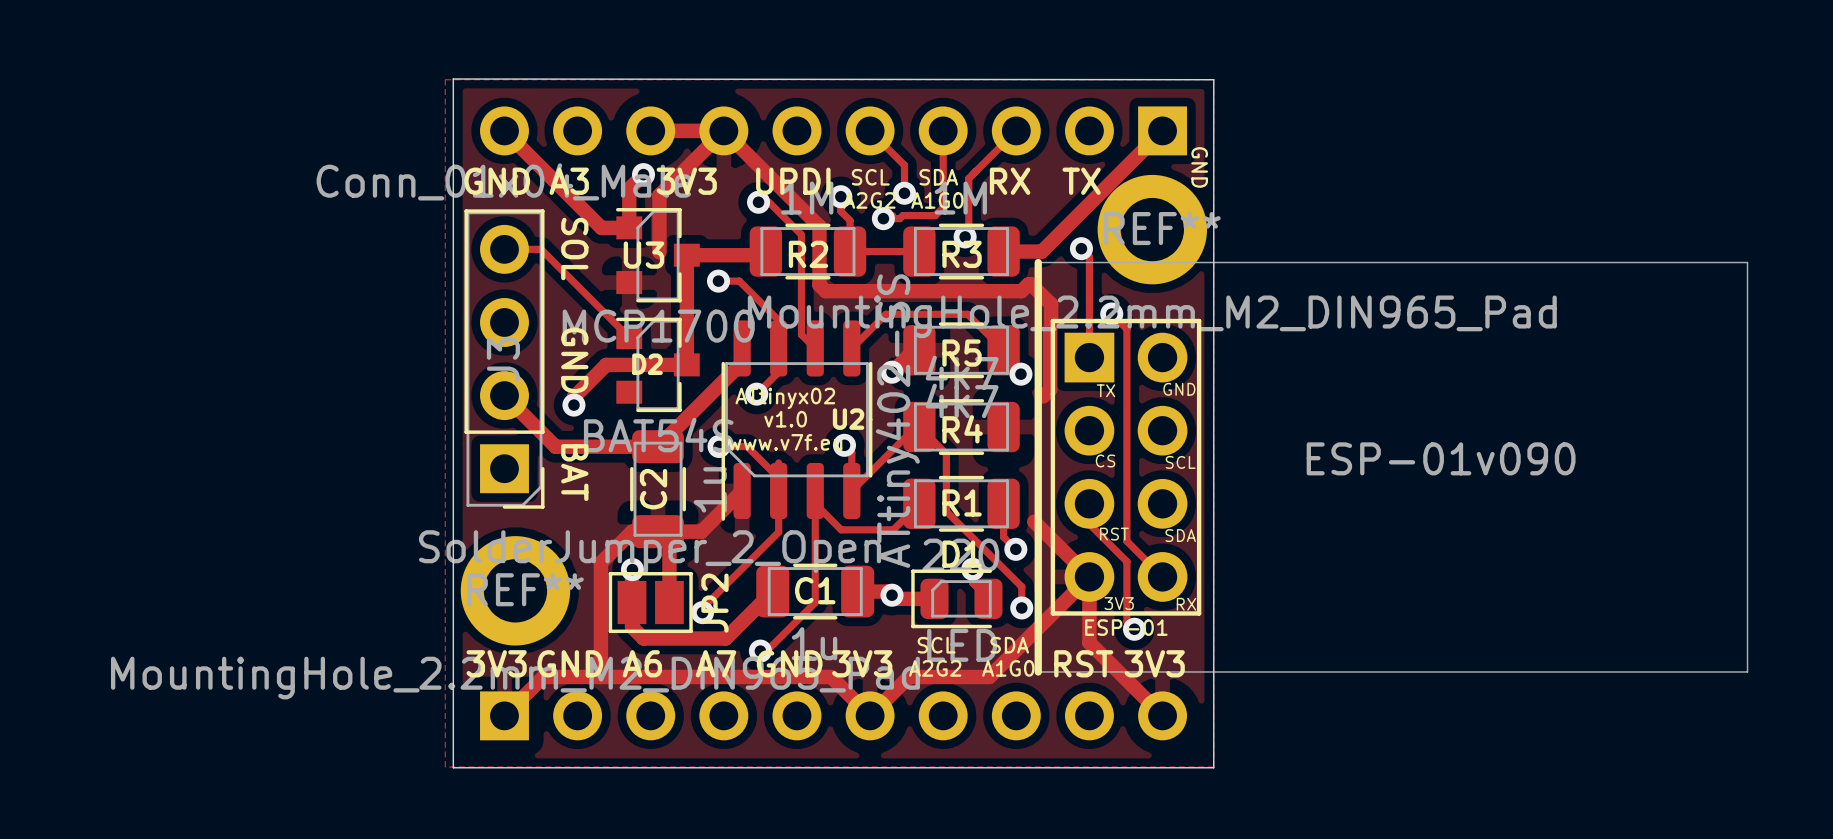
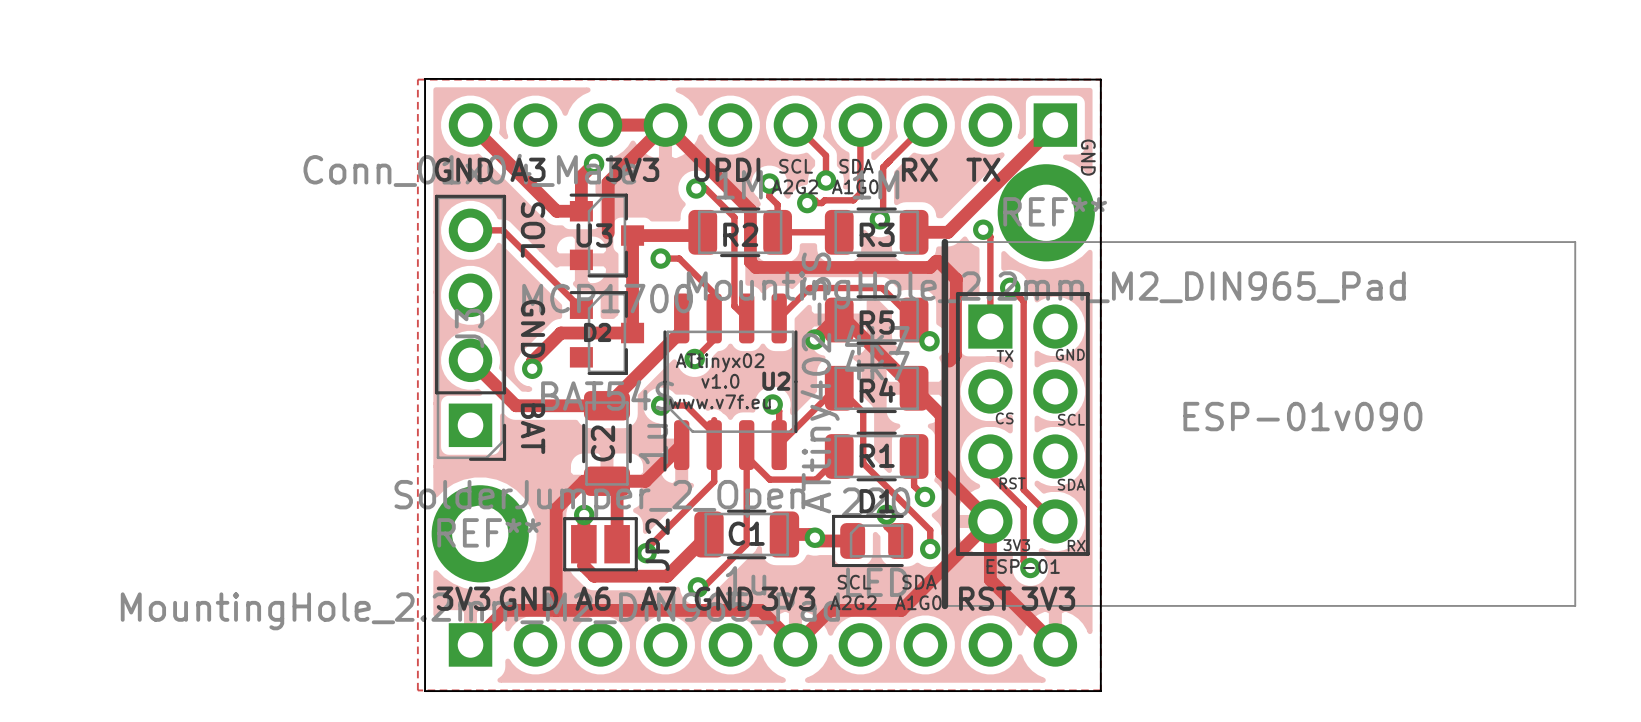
track: none -> (845, 320) (941, 415) (941, 472)

